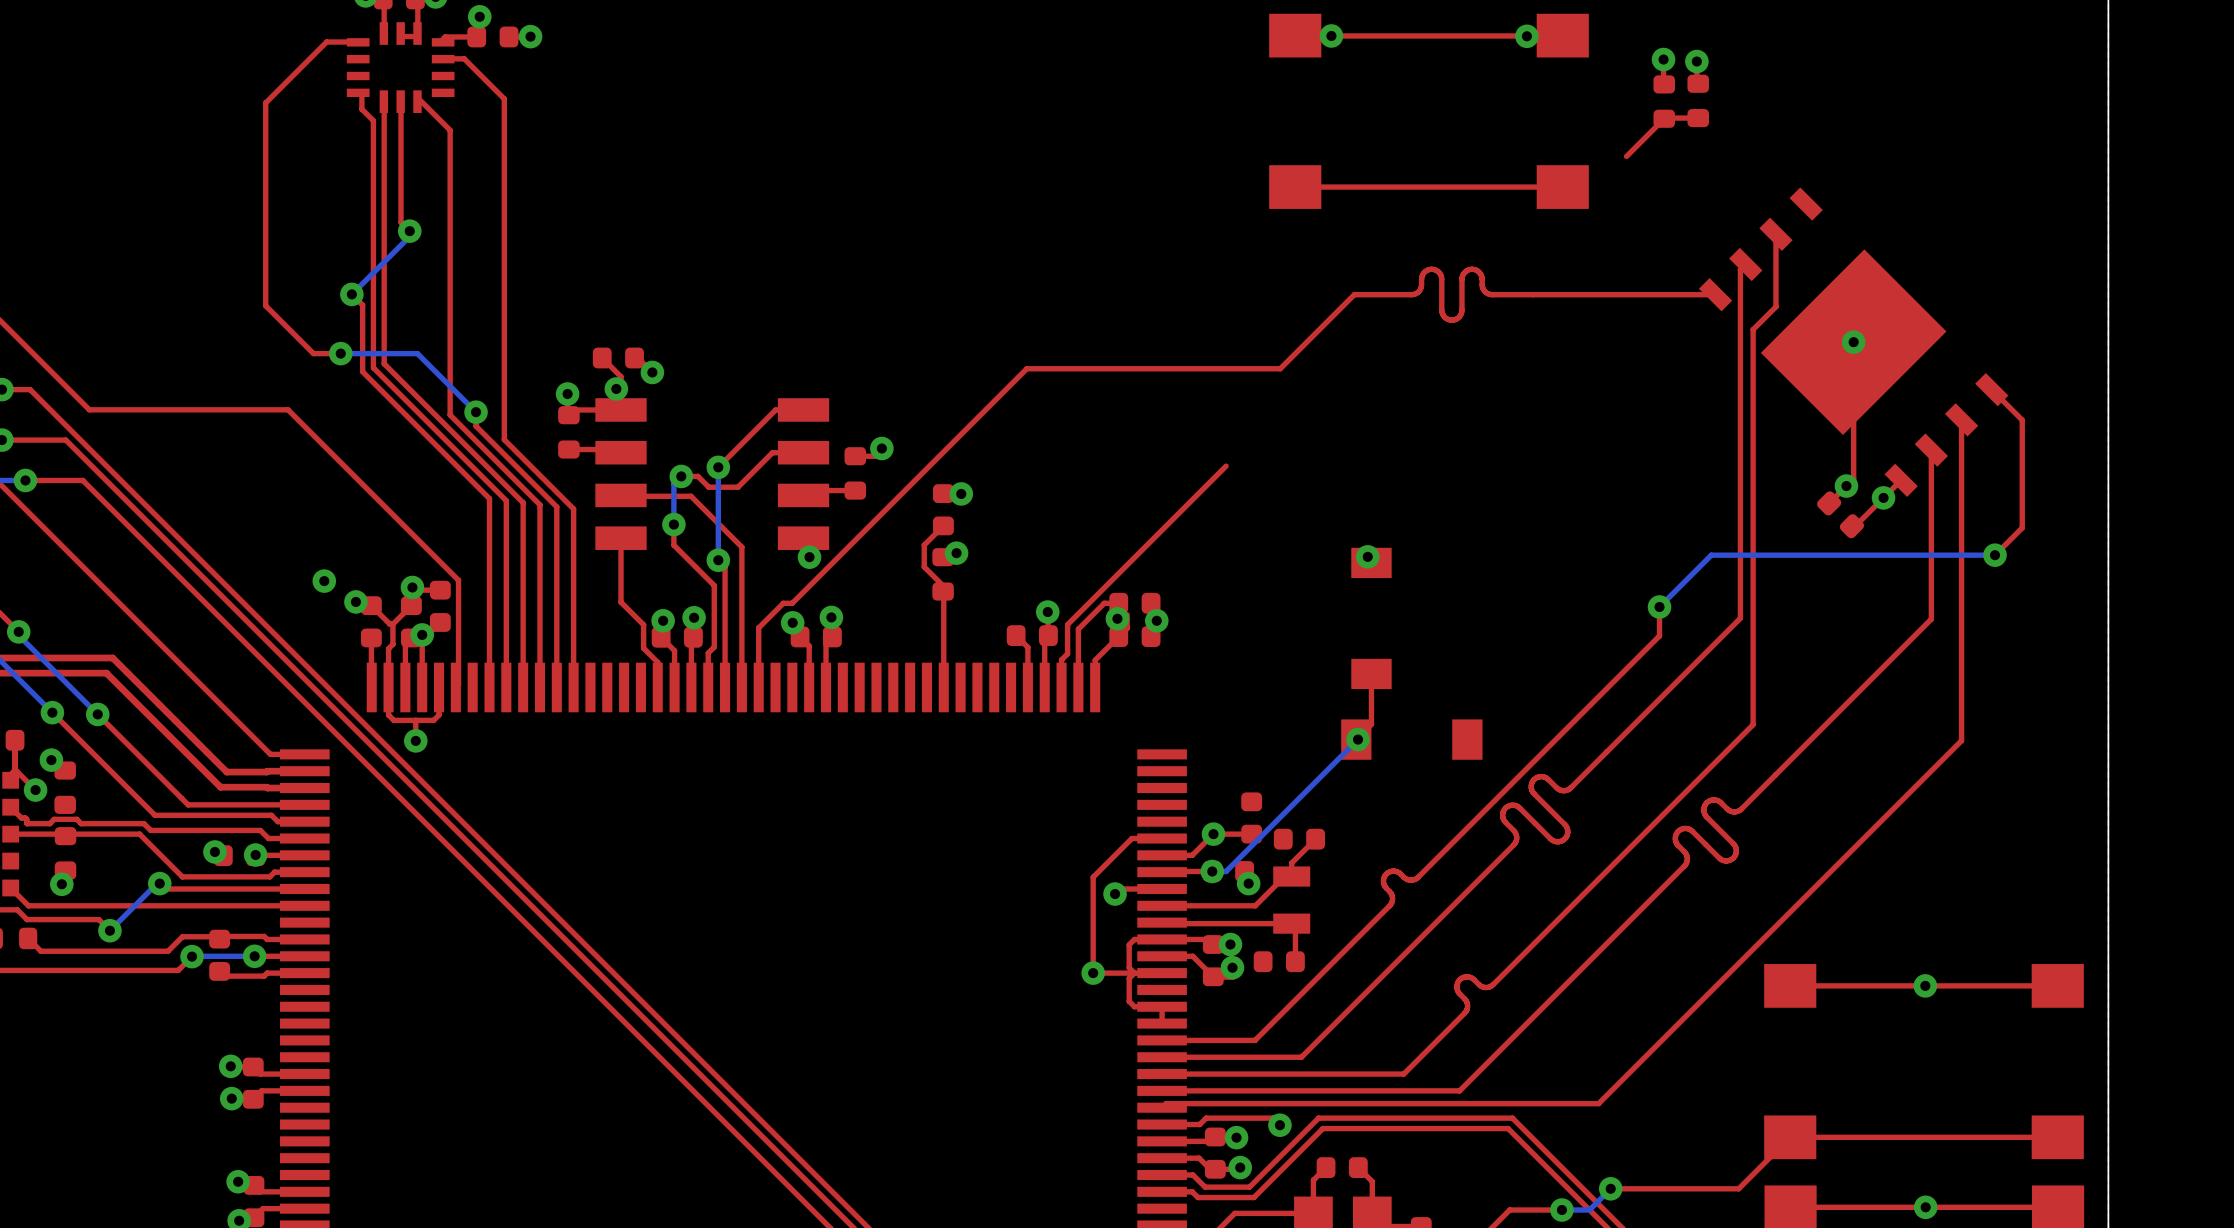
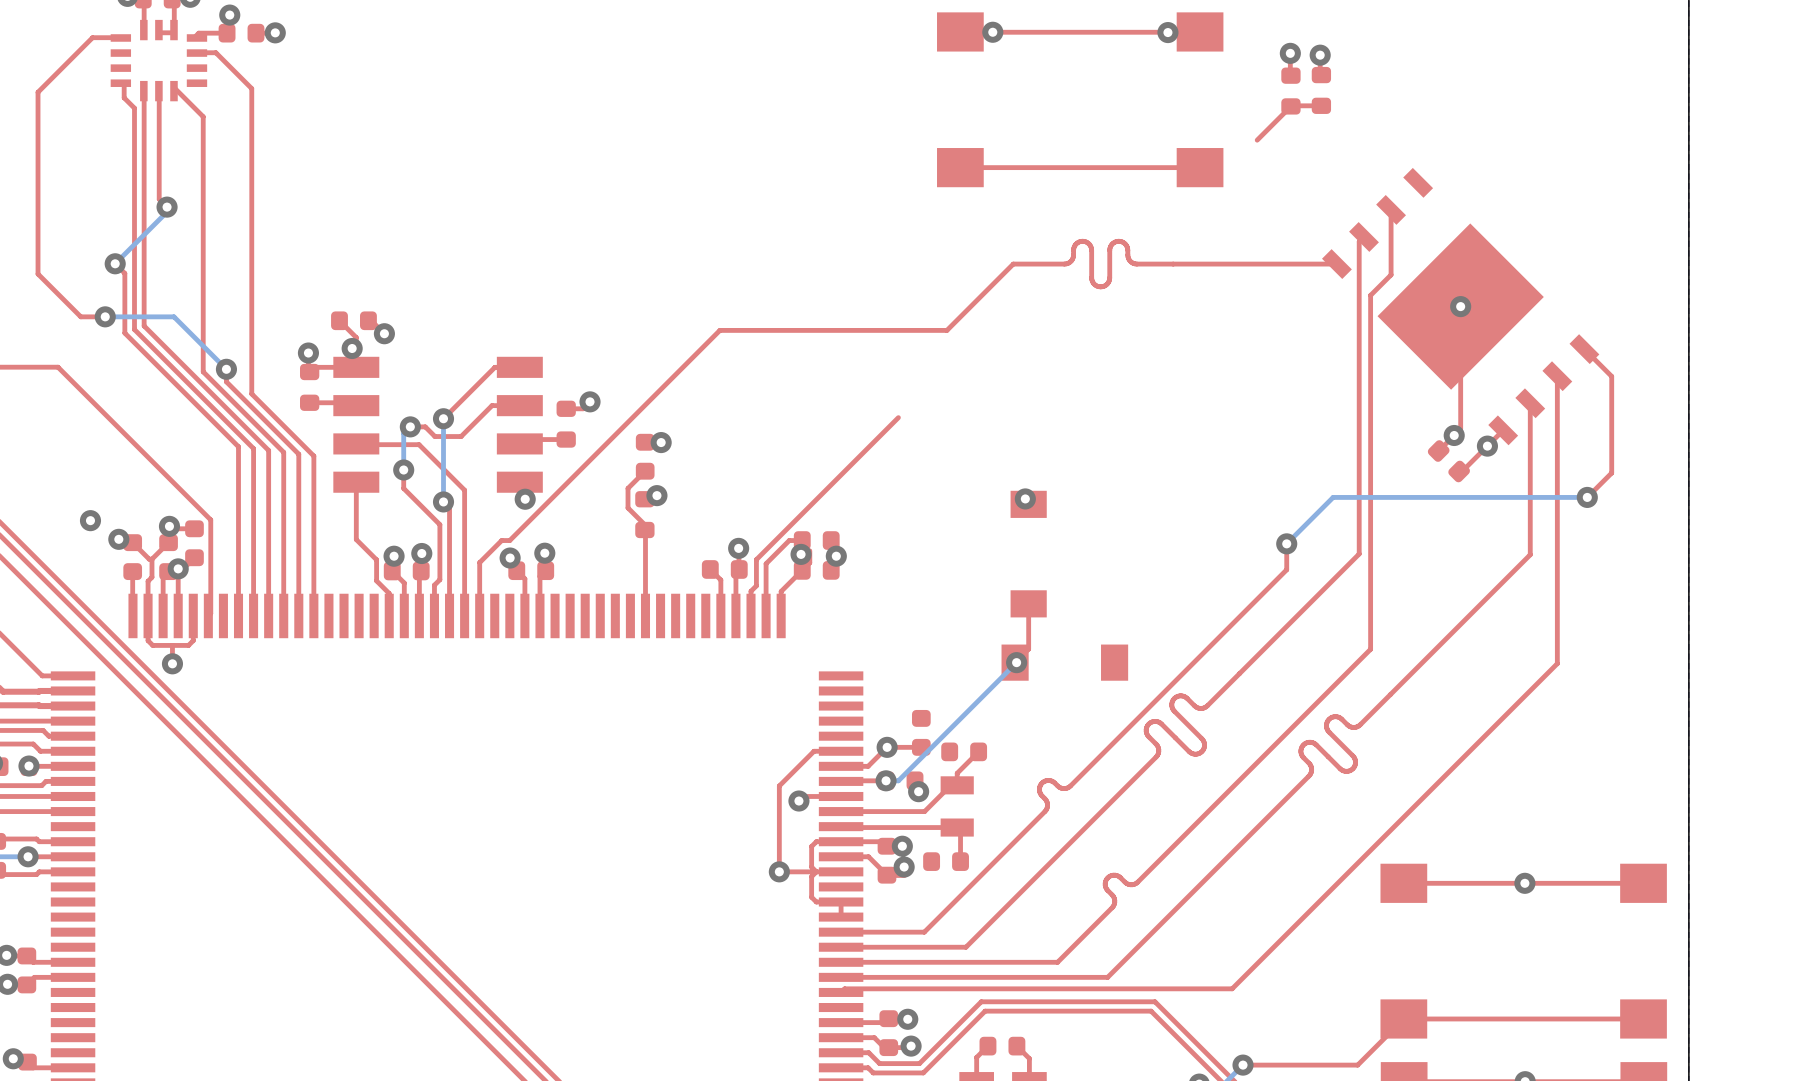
top track: (1162, 1124) (1199, 1124) (1206, 1118) (1272, 1118) (1279, 1125) -> none
via: (1279, 1125) -> none

